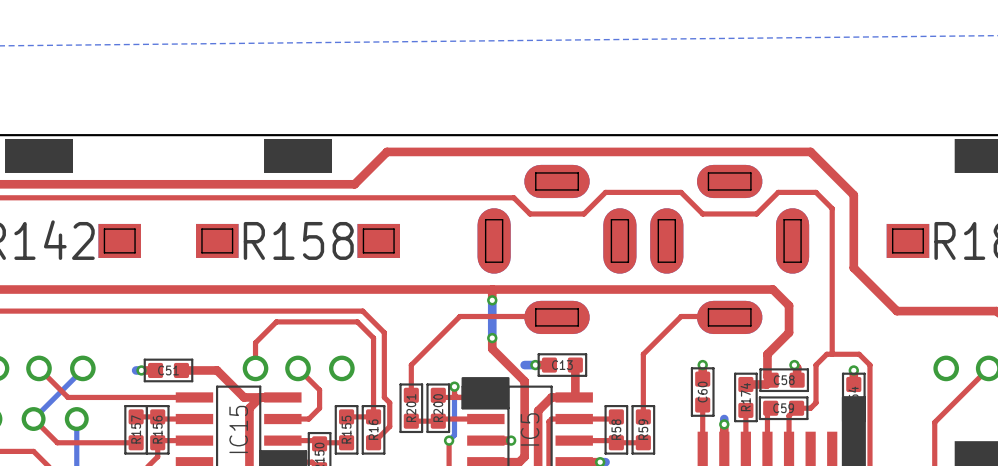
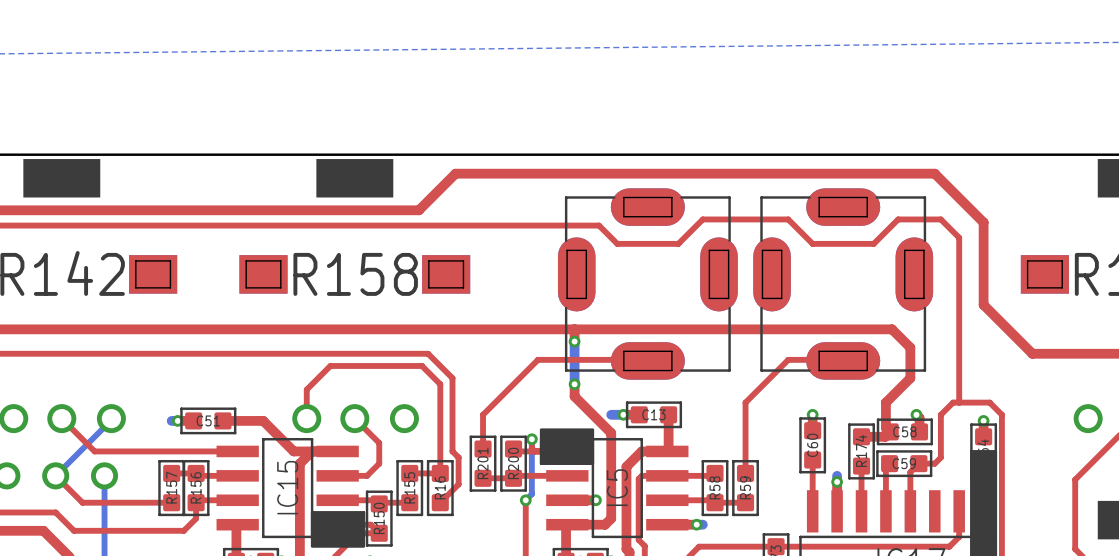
part footprint: [477, 164, 637, 335] -> [557, 188, 738, 380]
part footprint: [650, 164, 810, 335] -> [753, 188, 934, 380]

